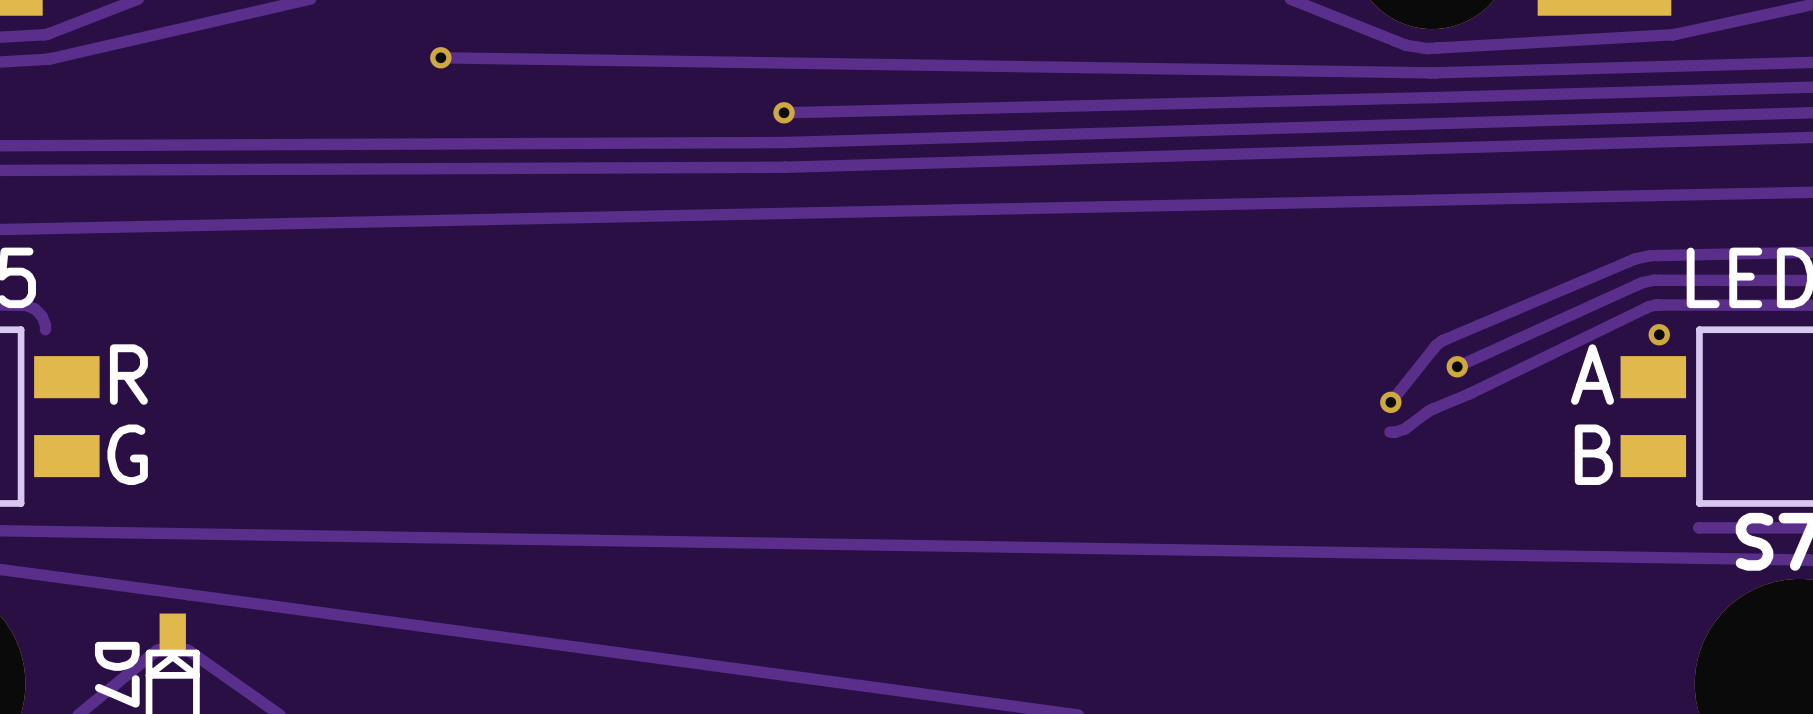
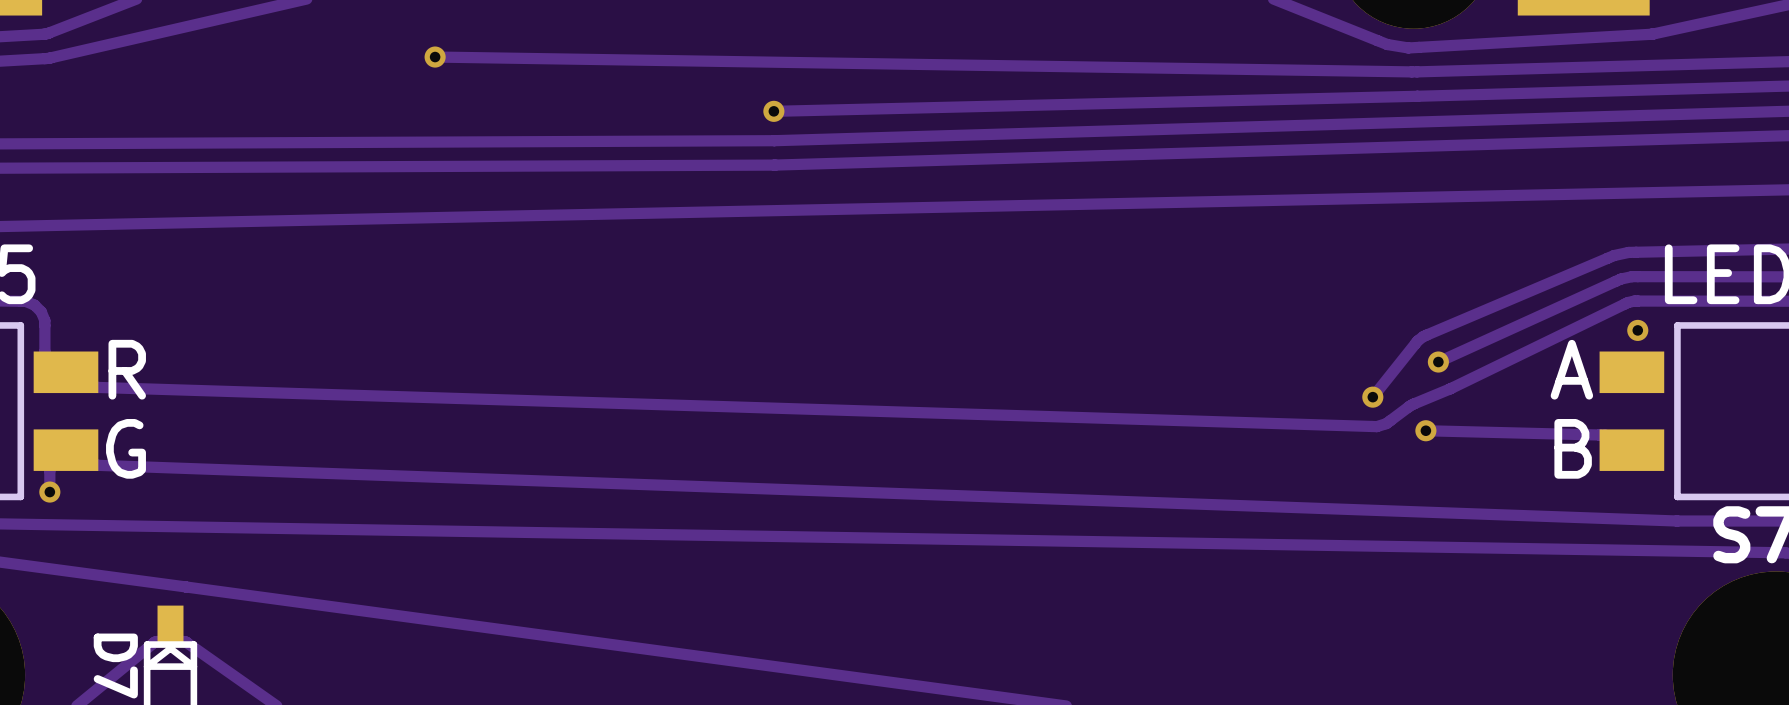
track: none -> (44, 325) (44, 357) (65, 372) (92, 387) (1371, 426)
track: none -> (1425, 430) (1605, 435) (1631, 450)
via: none -> (1425, 430)
track: none -> (49, 492) (49, 465) (65, 450) (92, 465) (1676, 521)
via: none -> (49, 492)

